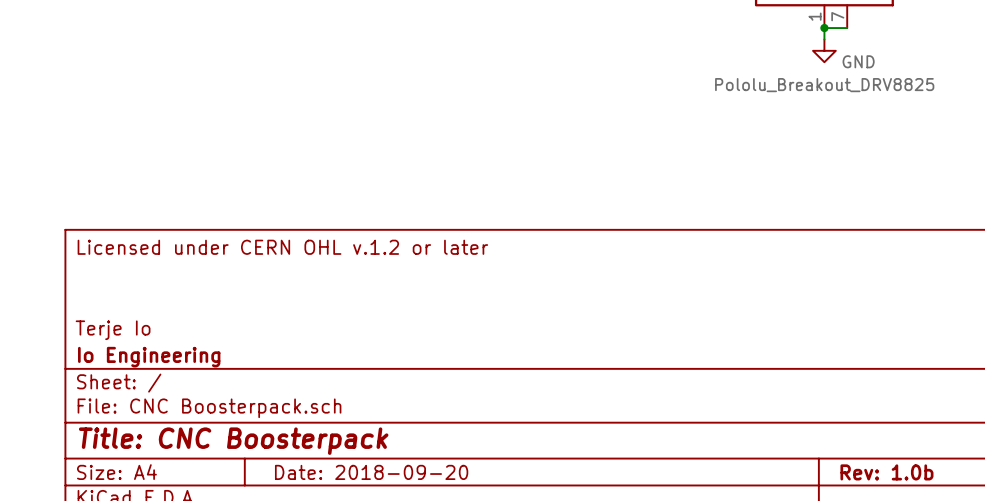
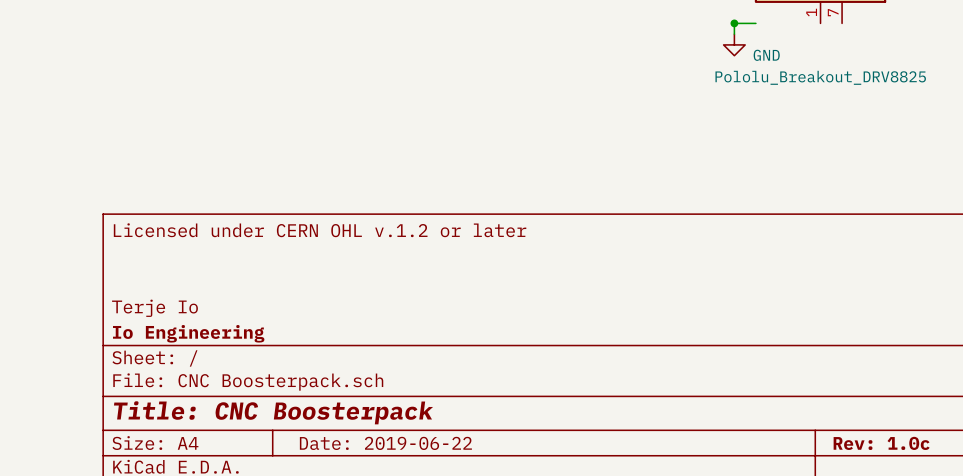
junction: none -> (734, 23)
junction: (824, 28) -> none
wire: (847, 28) (824, 28) (824, 39) -> (755, 23) (734, 23) (734, 34)
power symbol position: GND (824, 50) -> GND (734, 44)
title block: Date: 2018-09-20 (371, 472) -> Date: 2019-06-22 (385, 443)
title block: Rev: 1.0b (886, 472) -> Rev: 1.0c (881, 443)

